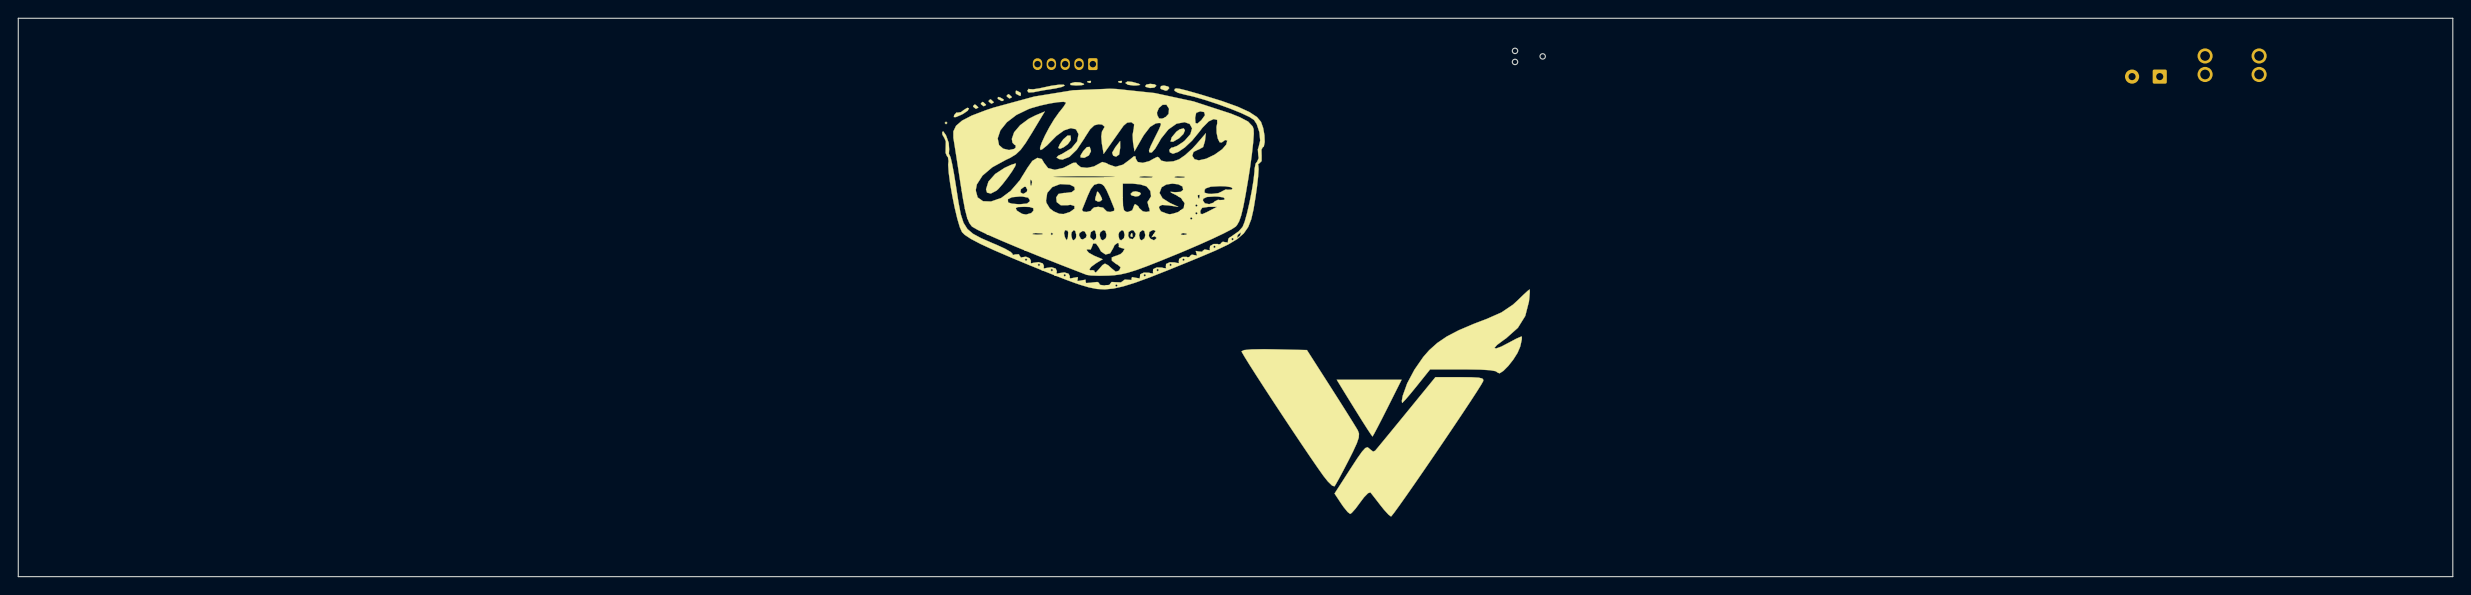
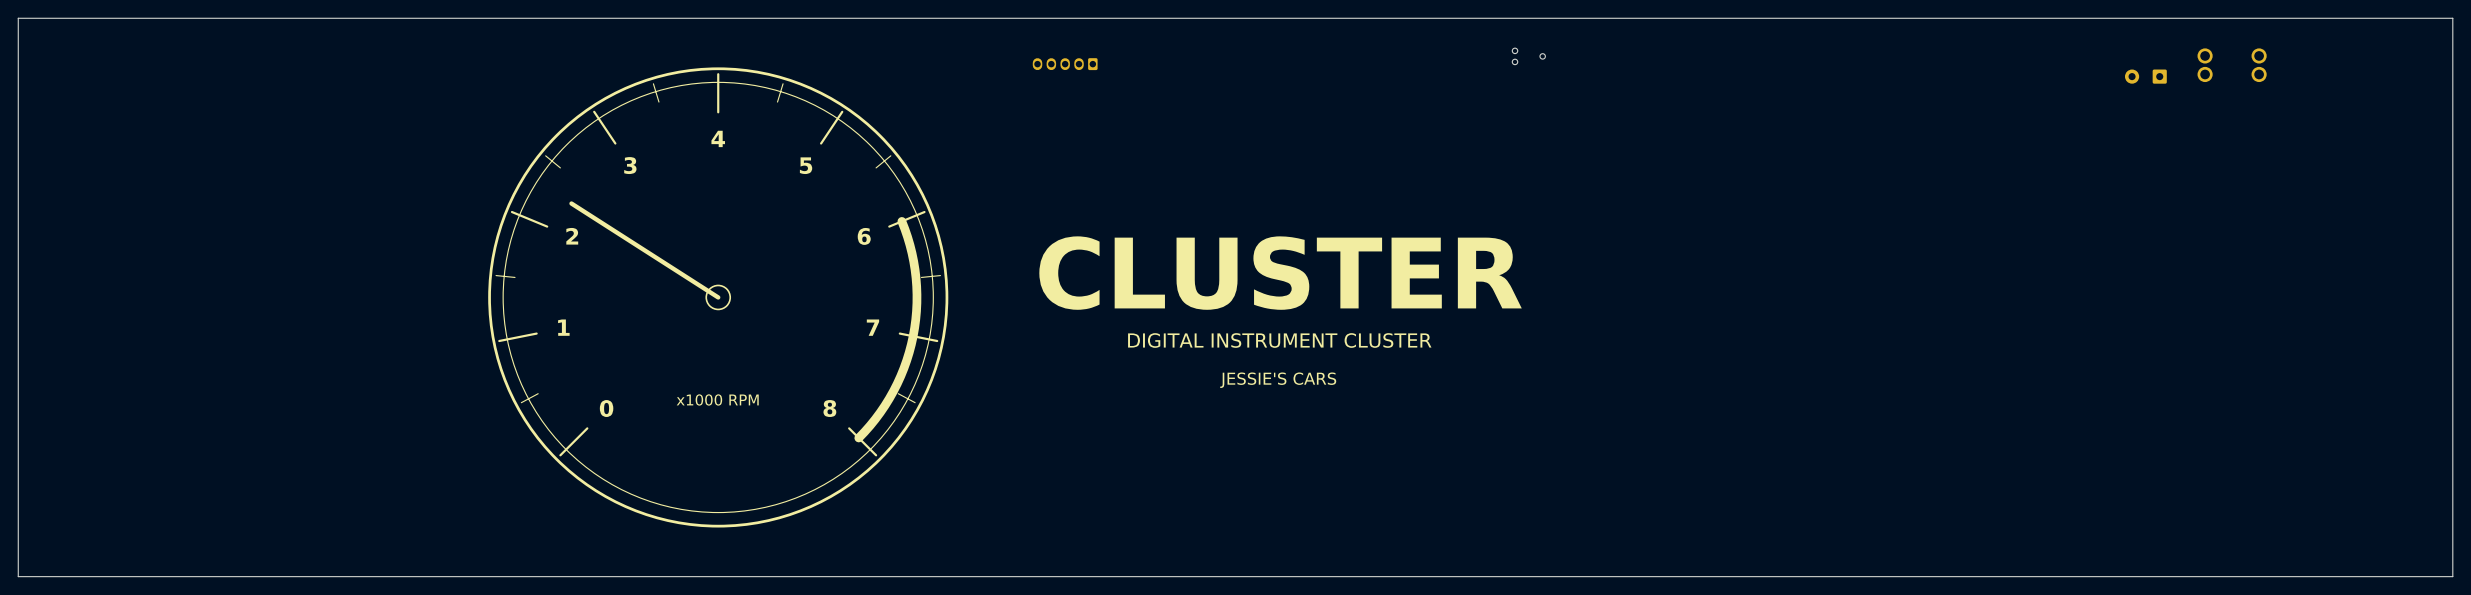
drawing: none -> [488, 67, 949, 528]
line: none -> (718, 74) (718, 112)
drawing: [942, 80, 1265, 290] -> none
line: none -> (653, 83) (658, 102)
line: none -> (783, 83) (777, 102)
line: none -> (594, 111) (615, 143)
line: none -> (842, 111) (821, 143)
text: none -> 4 (718, 138)
line: none -> (545, 155) (560, 167)
line: none -> (890, 155) (876, 167)
text: none -> 3 (630, 165)
text: none -> 5 (806, 165)
line: none -> (571, 203) (718, 297)
line: none -> (511, 212) (547, 226)
line: none -> (924, 212) (889, 226)
line: none -> (901, 221) (912, 253) (916, 277) (916, 311) (913, 336) (903, 368) (893, 391) (875, 419) (858, 437)
text: none -> 2 (572, 236)
text: none -> 6 (864, 236)
text: none -> CLUSTER (1280, 273)
line: none -> (496, 275) (515, 277)
line: none -> (940, 275) (921, 277)
drawing: [1241, 289, 1530, 517] -> none
text: none -> 1 (563, 327)
text: none -> 7 (872, 327)
line: none -> (536, 333) (499, 341)
line: none -> (899, 333) (937, 341)
text: none -> DIGITAL INSTRUMENT CLUSTER (1279, 340)
text: none -> JESSIE'S CARS (1278, 380)
line: none -> (538, 393) (521, 402)
line: none -> (898, 393) (915, 402)
text: none -> x1000 RPM (717, 399)
text: none -> 0 (606, 408)
text: none -> 8 (829, 408)
line: none -> (587, 428) (560, 455)
line: none -> (849, 428) (876, 455)

